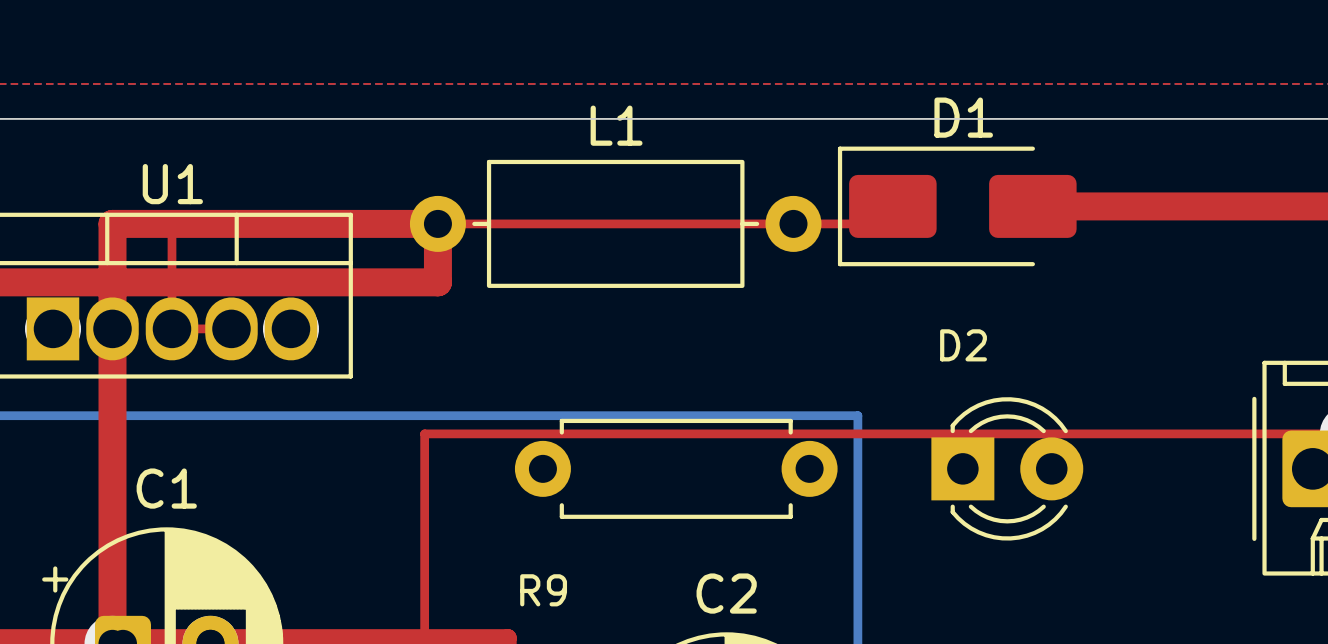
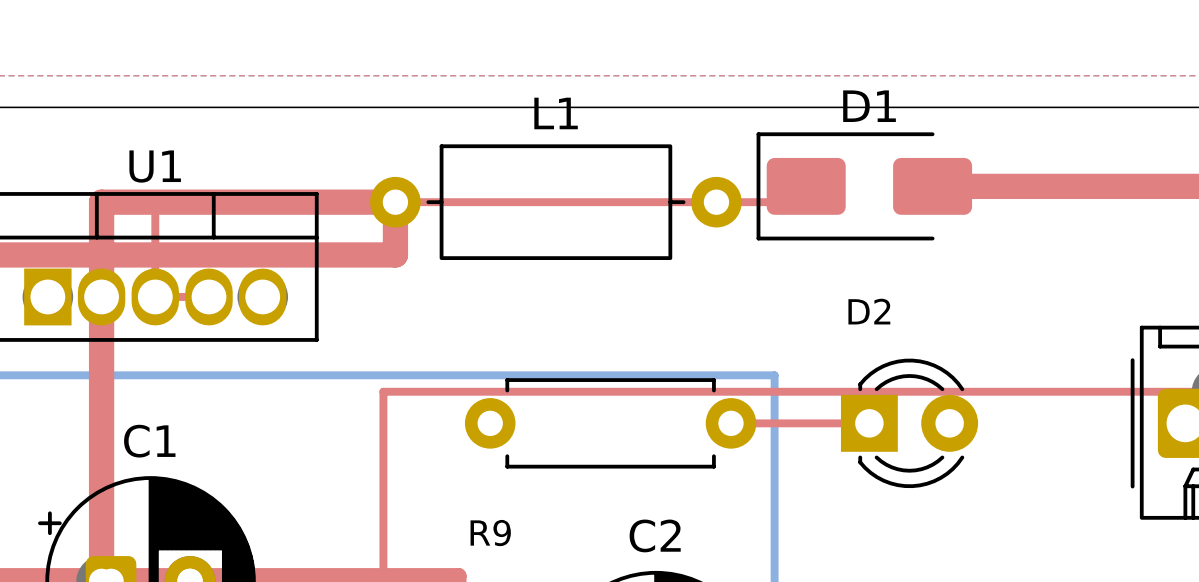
top track: none -> (731, 423) (869, 423)

